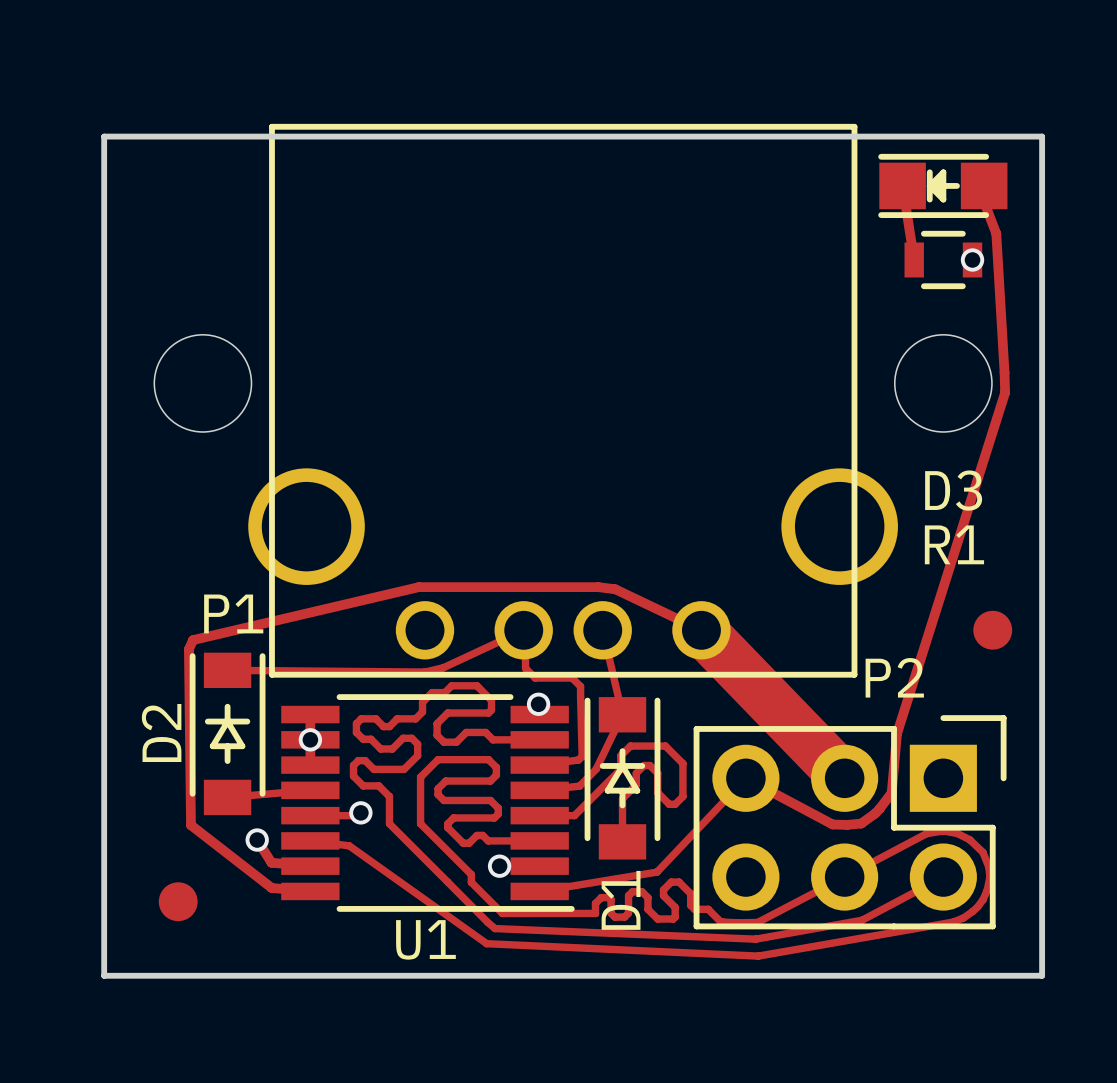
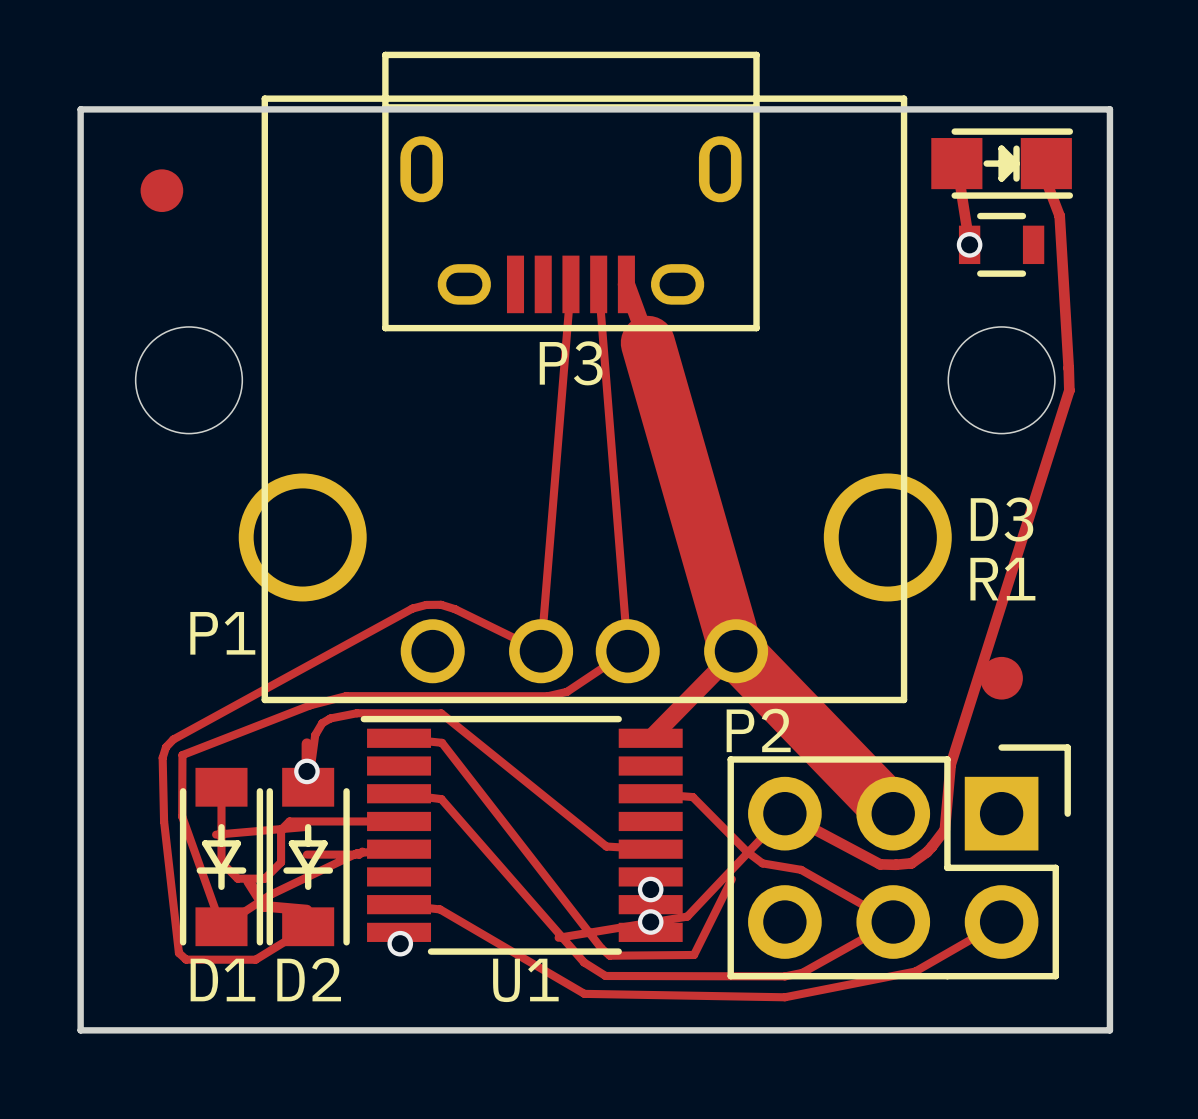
D3 rotation: 0° (942, 185) -> 180° (1002, 163)
part: none -> (161, 190)
P3: none -> (570, 191)
via position: (972, 259) -> (969, 244)
track: none -> (570, 284) (541, 651) (455, 609) (441, 604) (426, 604) (412, 608) (173, 739) (165, 747) (162, 757) (164, 821) (178, 953) (186, 959) (255, 959) (308, 927)
track: none -> (598, 284) (627, 651) (567, 691) (547, 696) (346, 696) (310, 705) (182, 755) (182, 816) (221, 926) (270, 894) (357, 853) (399, 849)
track: none -> (626, 284) (647, 342) (736, 651) (650, 738) (670, 738)
R1 name position: R1 (954, 544) -> R1 (1002, 579)
track: (602, 630) (622, 714) (596, 769) (579, 786) (539, 790) -> none
track: (701, 630) (615, 589) (598, 587) (418, 587) (193, 640) (188, 649) (190, 825) (271, 887) (310, 891) -> none
part position: (992, 630) -> (1001, 678)
track: (227, 670) (425, 672) (443, 667) (523, 630) (525, 632) (525, 668) (535, 678) (572, 678) (580, 686) (582, 756) (578, 760) (539, 765) -> none
P2 name position: P2 (894, 677) -> P2 (758, 730)
via: (538, 704) -> none
track: none -> (399, 738) (441, 742) (601, 948) (609, 955) (694, 954) (731, 879)
D2 name position: D2 (161, 733) -> D2 (309, 979)
D2 rotation: 0° (227, 733) -> 180° (308, 857)
D2 position: (227, 733) -> (308, 857)
track: (539, 739) (493, 739) (485, 732) (466, 732) (456, 742) (443, 742) (437, 735) (437, 723) (447, 713) (488, 713) (491, 710) (491, 700) (476, 685) (451, 685) (444, 692) (432, 692) (422, 702) (422, 712) (415, 718) (397, 718) (389, 726) (383, 726) (375, 718) (361, 718) (356, 723) (356, 732) (363, 739) (371, 739) (380, 748) (392, 748) (403, 738) (411, 738) (417, 744) (417, 755) (404, 769) (373, 769) (365, 760) (358, 760) (353, 765) (353, 776) (363, 785) (378, 785) (389, 796) (389, 823) (495, 928) (755, 939) (862, 920) (943, 877) -> (399, 904) (440, 909) (584, 993) (784, 997) (915, 971) (1001, 922)
track: none -> (221, 787) (221, 862) (237, 878) (264, 878) (281, 862) (281, 829) (289, 821) (399, 821)
track: none -> (308, 787) (315, 735) (322, 723) (330, 718) (356, 713) (441, 713) (606, 846) (650, 849)
track: none -> (399, 793) (441, 799) (584, 962) (605, 975) (784, 976) (802, 972) (893, 922) (801, 869) (762, 863) (746, 851) (692, 797) (650, 793)
D1 rotation: 0° (622, 778) -> 180° (221, 857)
D1 position: (622, 778) -> (221, 857)
U1 rotation: 0° (427, 803) -> 180° (521, 835)
via: (360, 812) -> none
track: (539, 815) (574, 815) (620, 769) (620, 755) (630, 746) (665, 746) (682, 763) (682, 796) (675, 804) (669, 804) (657, 792) (657, 773) (649, 765) (644, 765) (636, 773) (636, 784) (622, 798) (622, 841) (618, 838) -> none
via: (257, 840) -> none
track: (310, 840) (349, 845) (486, 943) (758, 956) (953, 922) (963, 917) (977, 906) (987, 889) (989, 876) (988, 867) (982, 852) (969, 839) (957, 833) (943, 830) (926, 833) (757, 922) (721, 922) (708, 909) (694, 909) (690, 905) (690, 893) (679, 882) (671, 882) (663, 889) (663, 895) (675, 907) (675, 917) (673, 919) (657, 919) (647, 909) (647, 897) (642, 891) (632, 891) (628, 895) (628, 913) (624, 917) (614, 917) (611, 913) (611, 899) (609, 897) (601, 897) (595, 903) (595, 913) (502, 913) (471, 882) (471, 874) (420, 823) (420, 777) (438, 759) (488, 759) (496, 767) (496, 775) (490, 781) (445, 781) (438, 788) (438, 794) (443, 800) (490, 800) (498, 808) (498, 814) (494, 817) (453, 817) (447, 823) (447, 827) (463, 843) (469, 843) (476, 835) (482, 835) (488, 840) (539, 840) -> none
via: none -> (650, 889)
via: (499, 866) -> none
via: none -> (650, 922)
via: none -> (400, 943)
part: (178, 901) -> none

